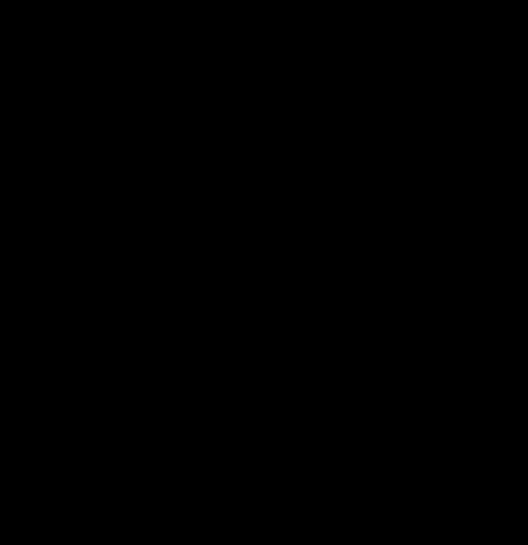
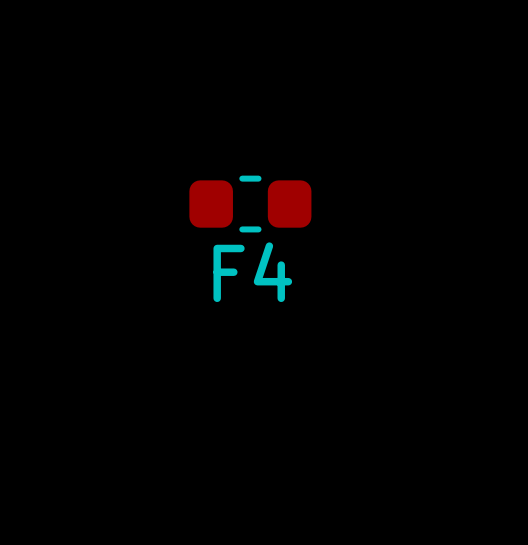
F4: none -> (250, 204)

